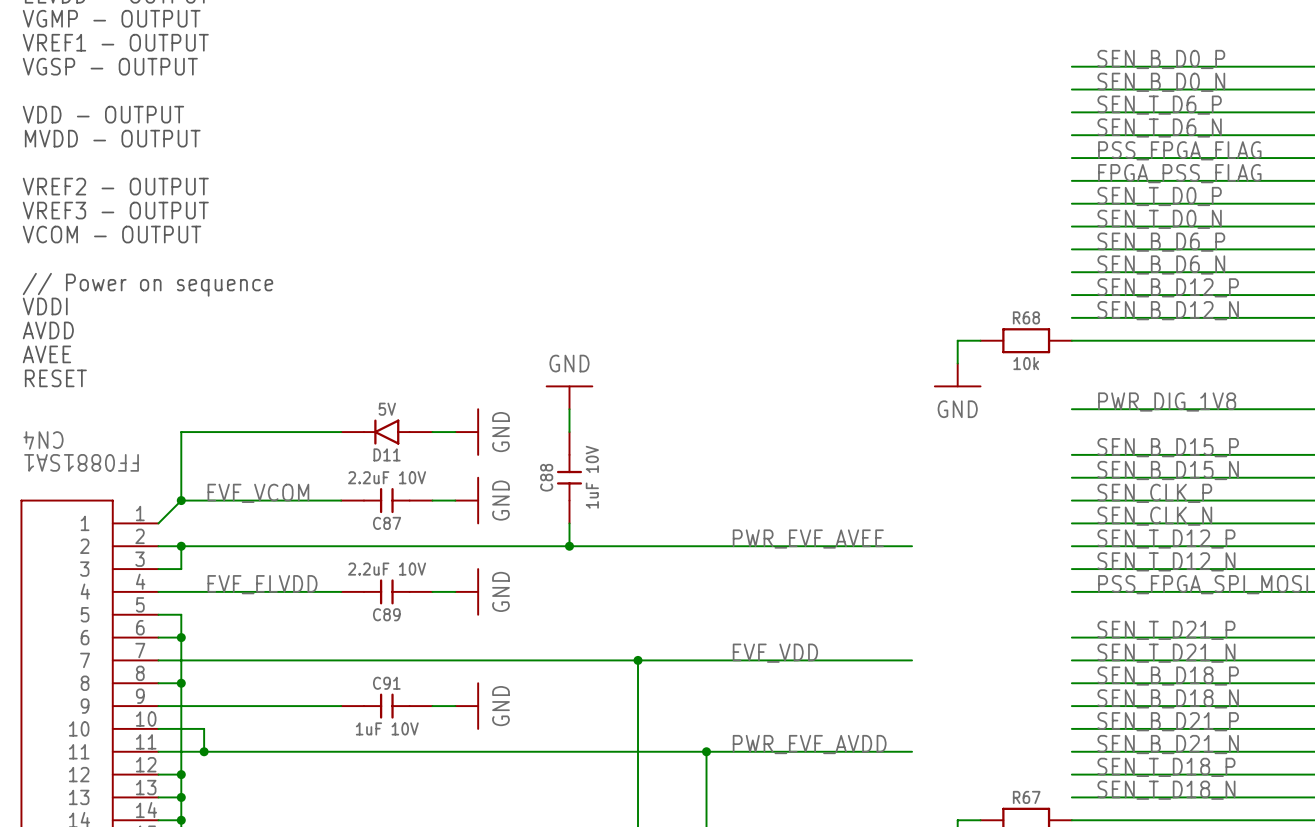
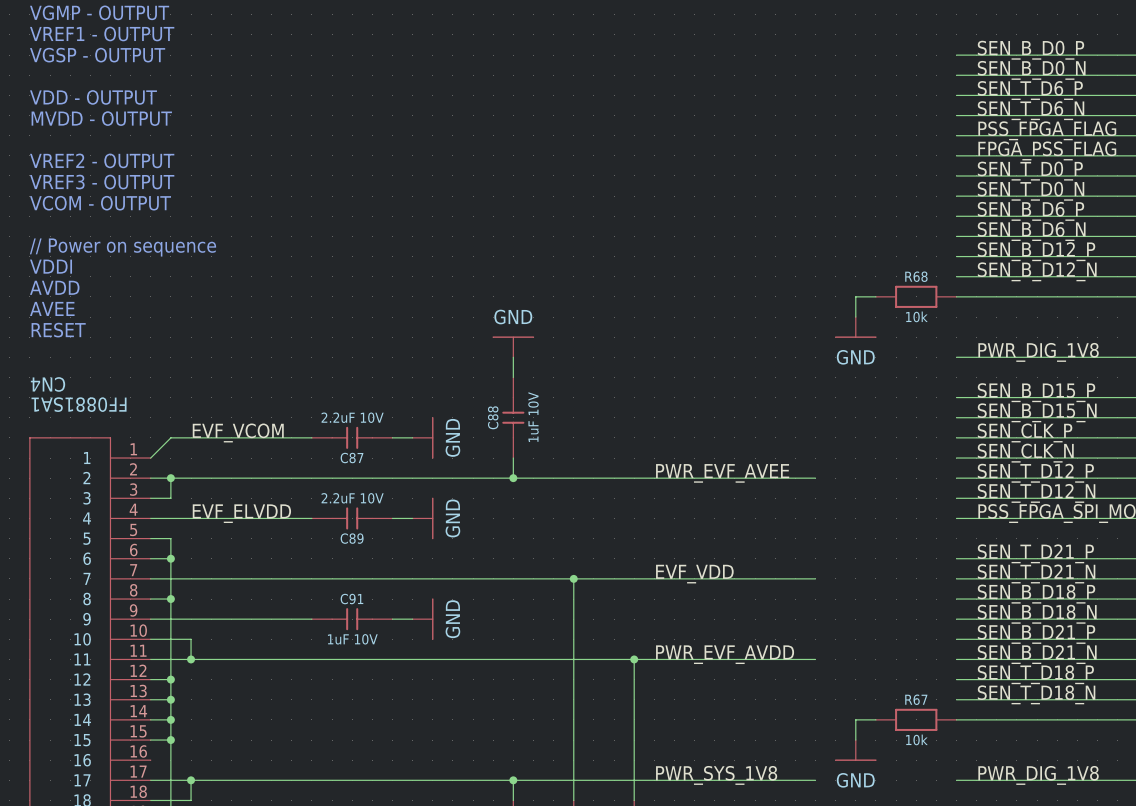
wire: (341, 432) (181, 432) (181, 500) -> none
D11: 5V (386, 432) -> none
wire: (432, 432) (455, 432) -> none
power symbol: GND (467, 432) -> none
junction: (181, 500) -> none

